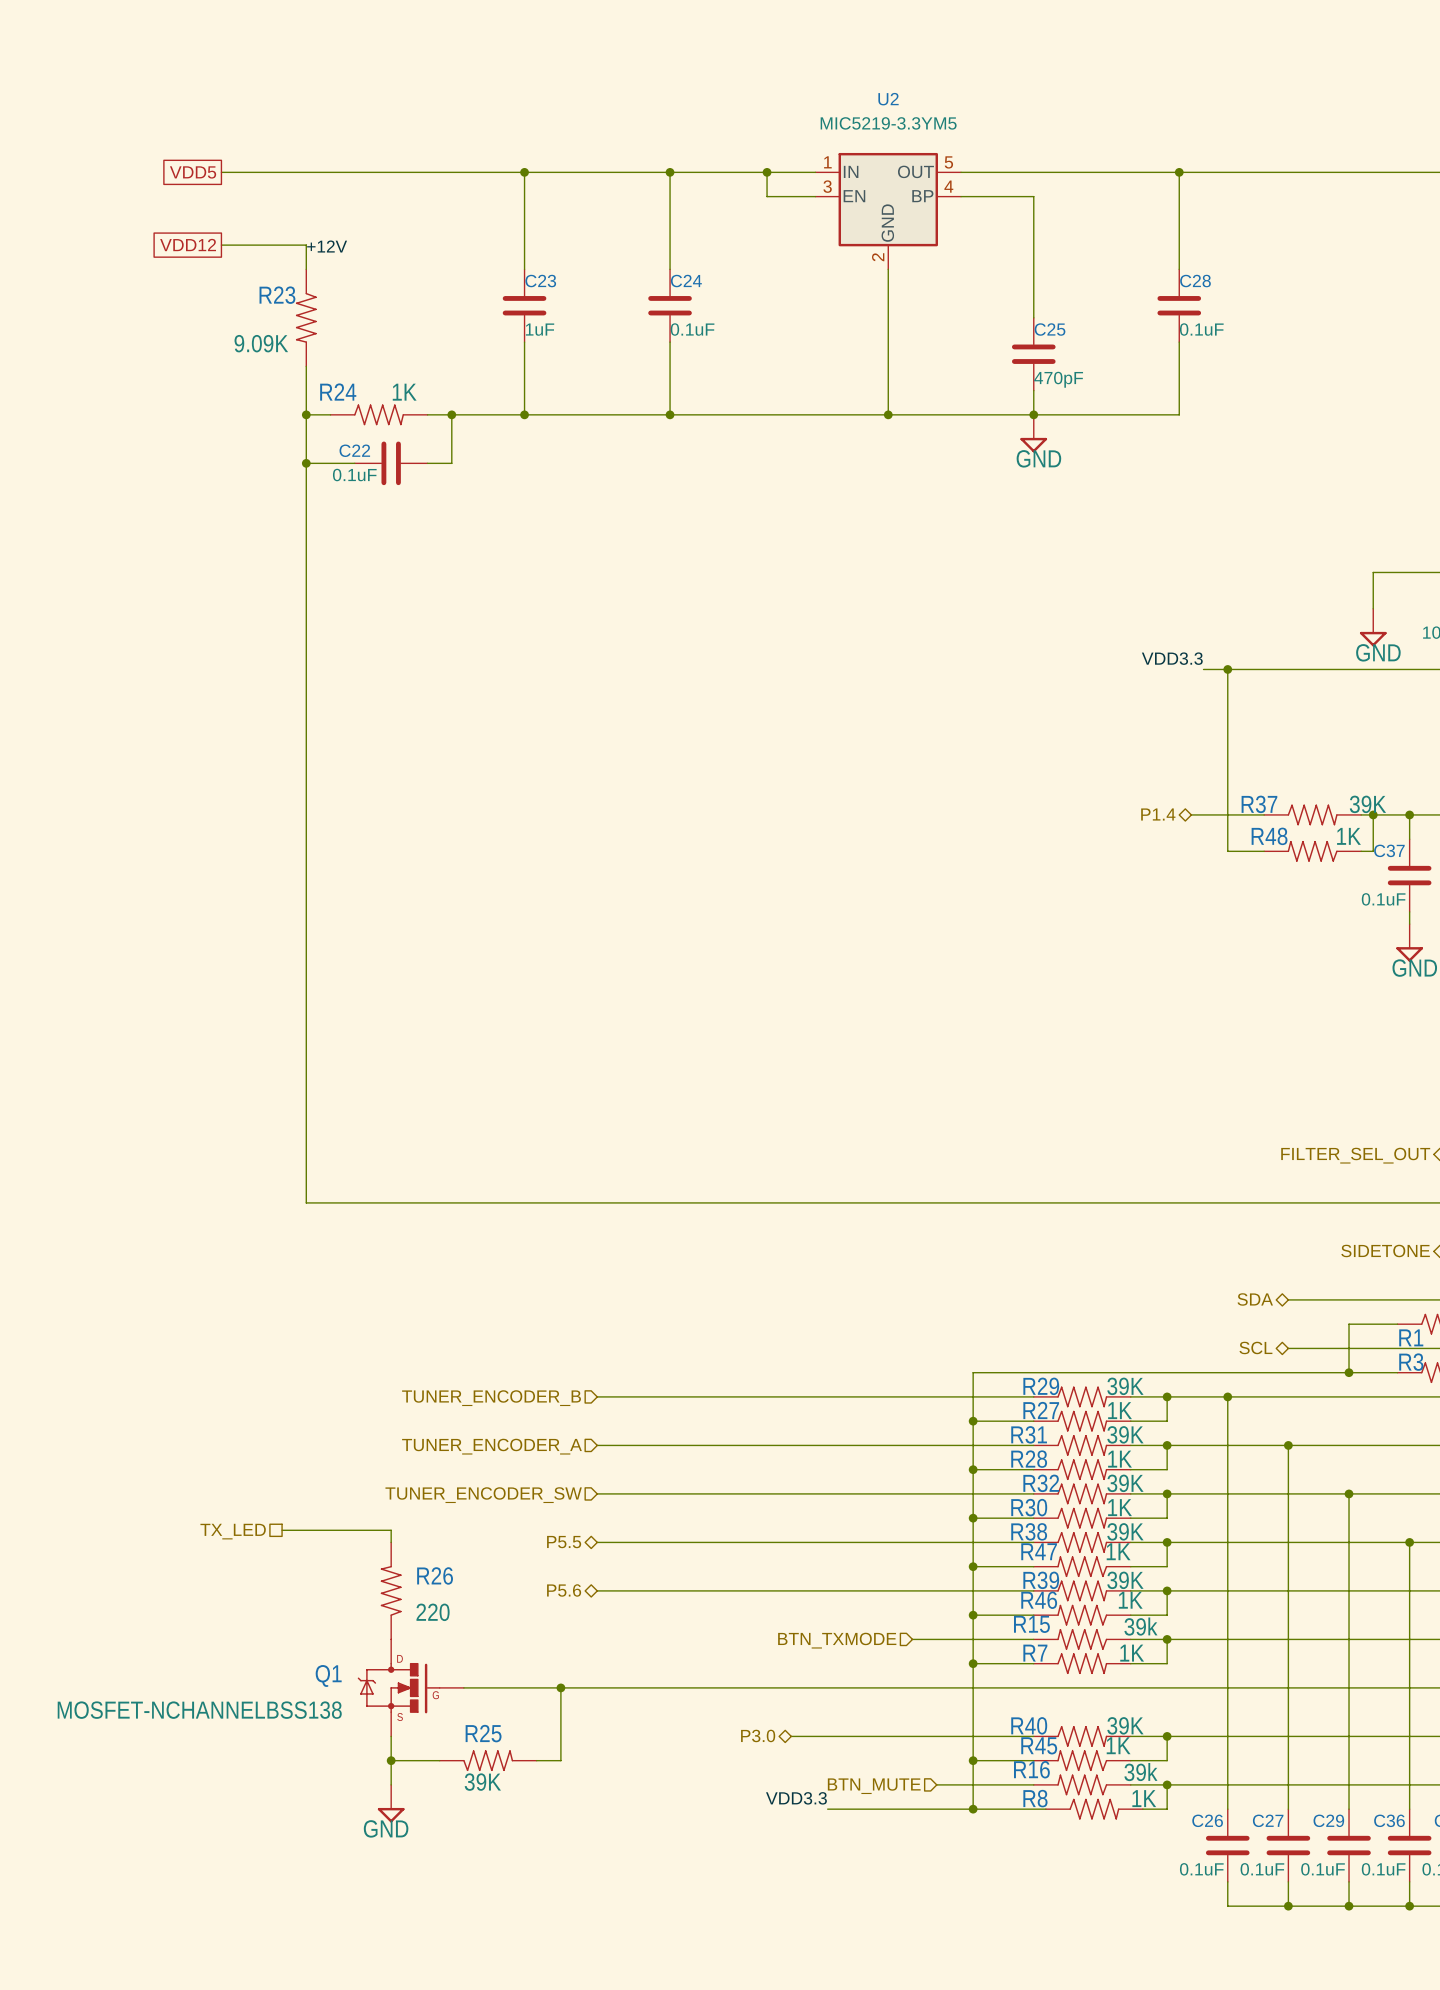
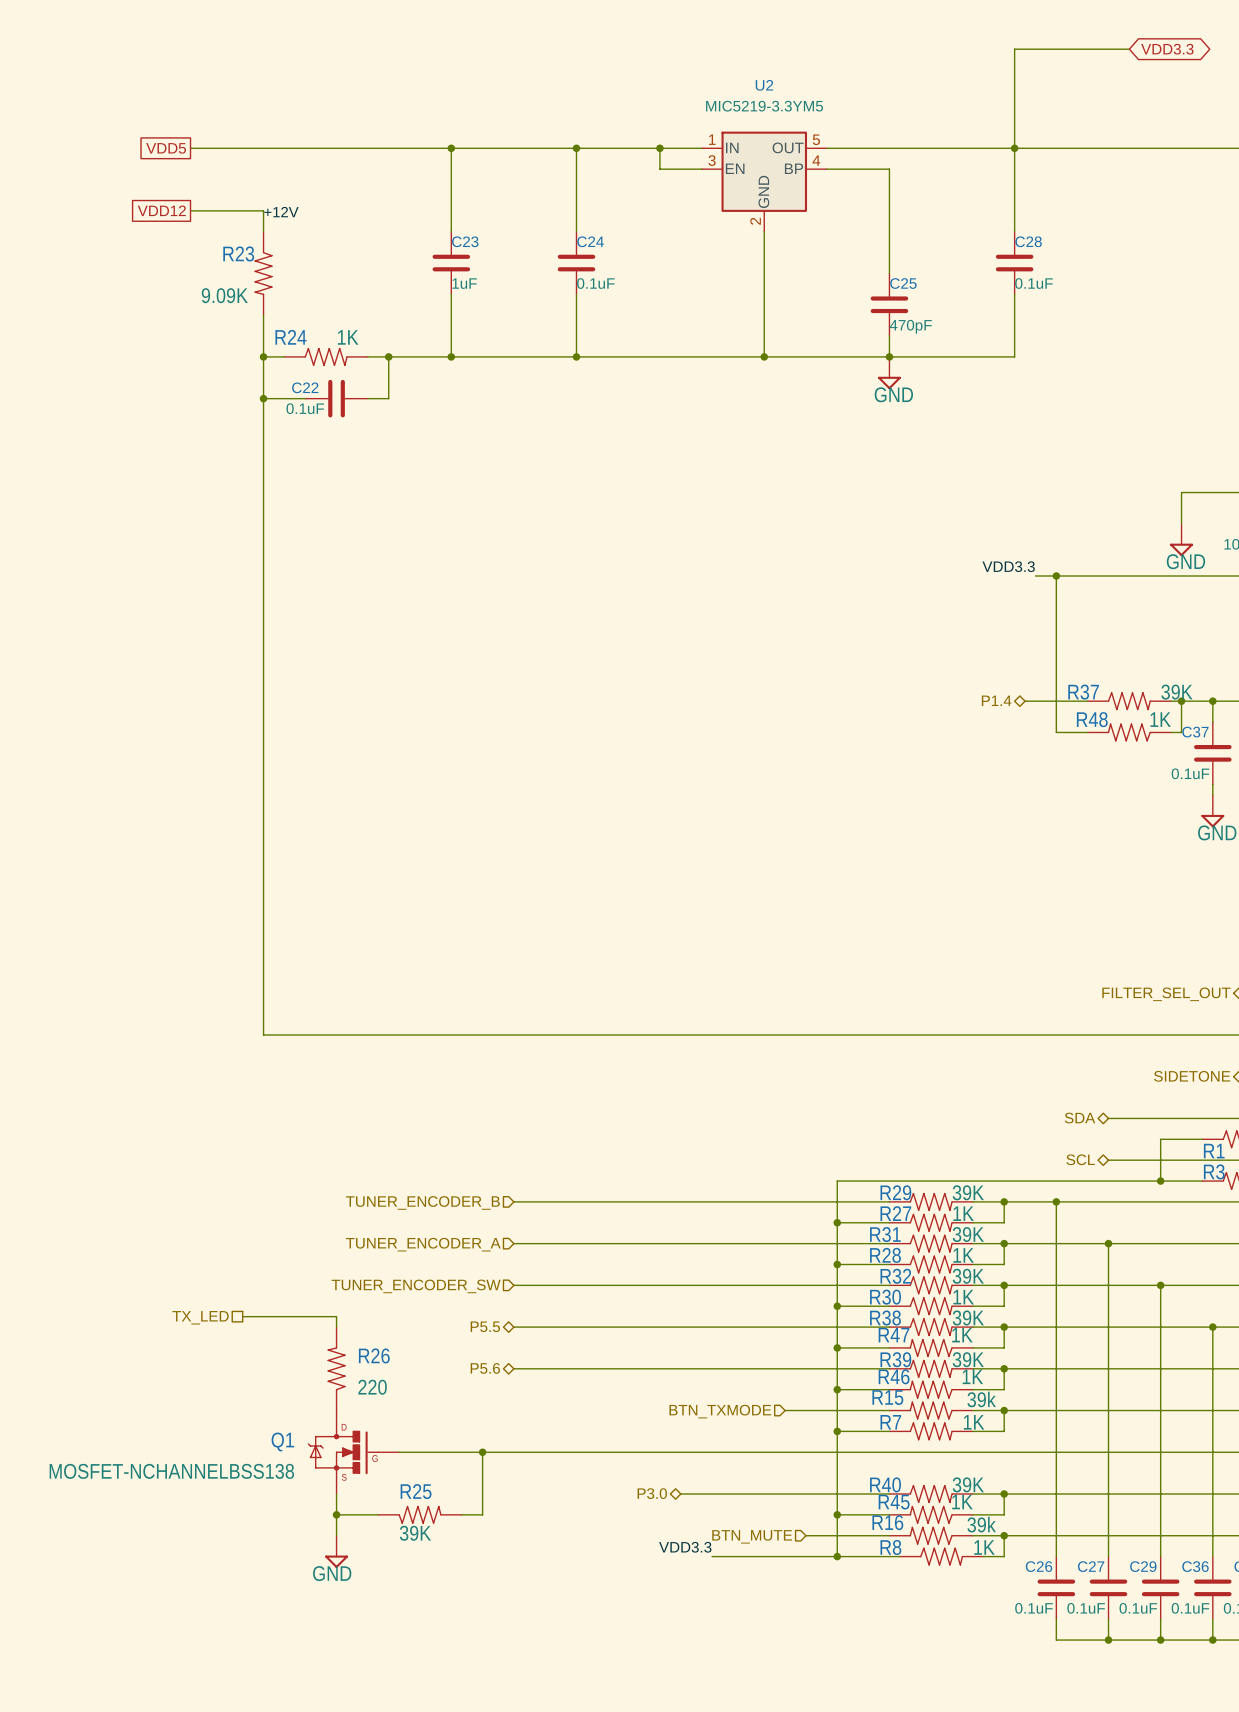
wire: none -> (1129, 49) (1014, 49) (1014, 148)
global label: none -> VDD3.3 (1167, 49)

